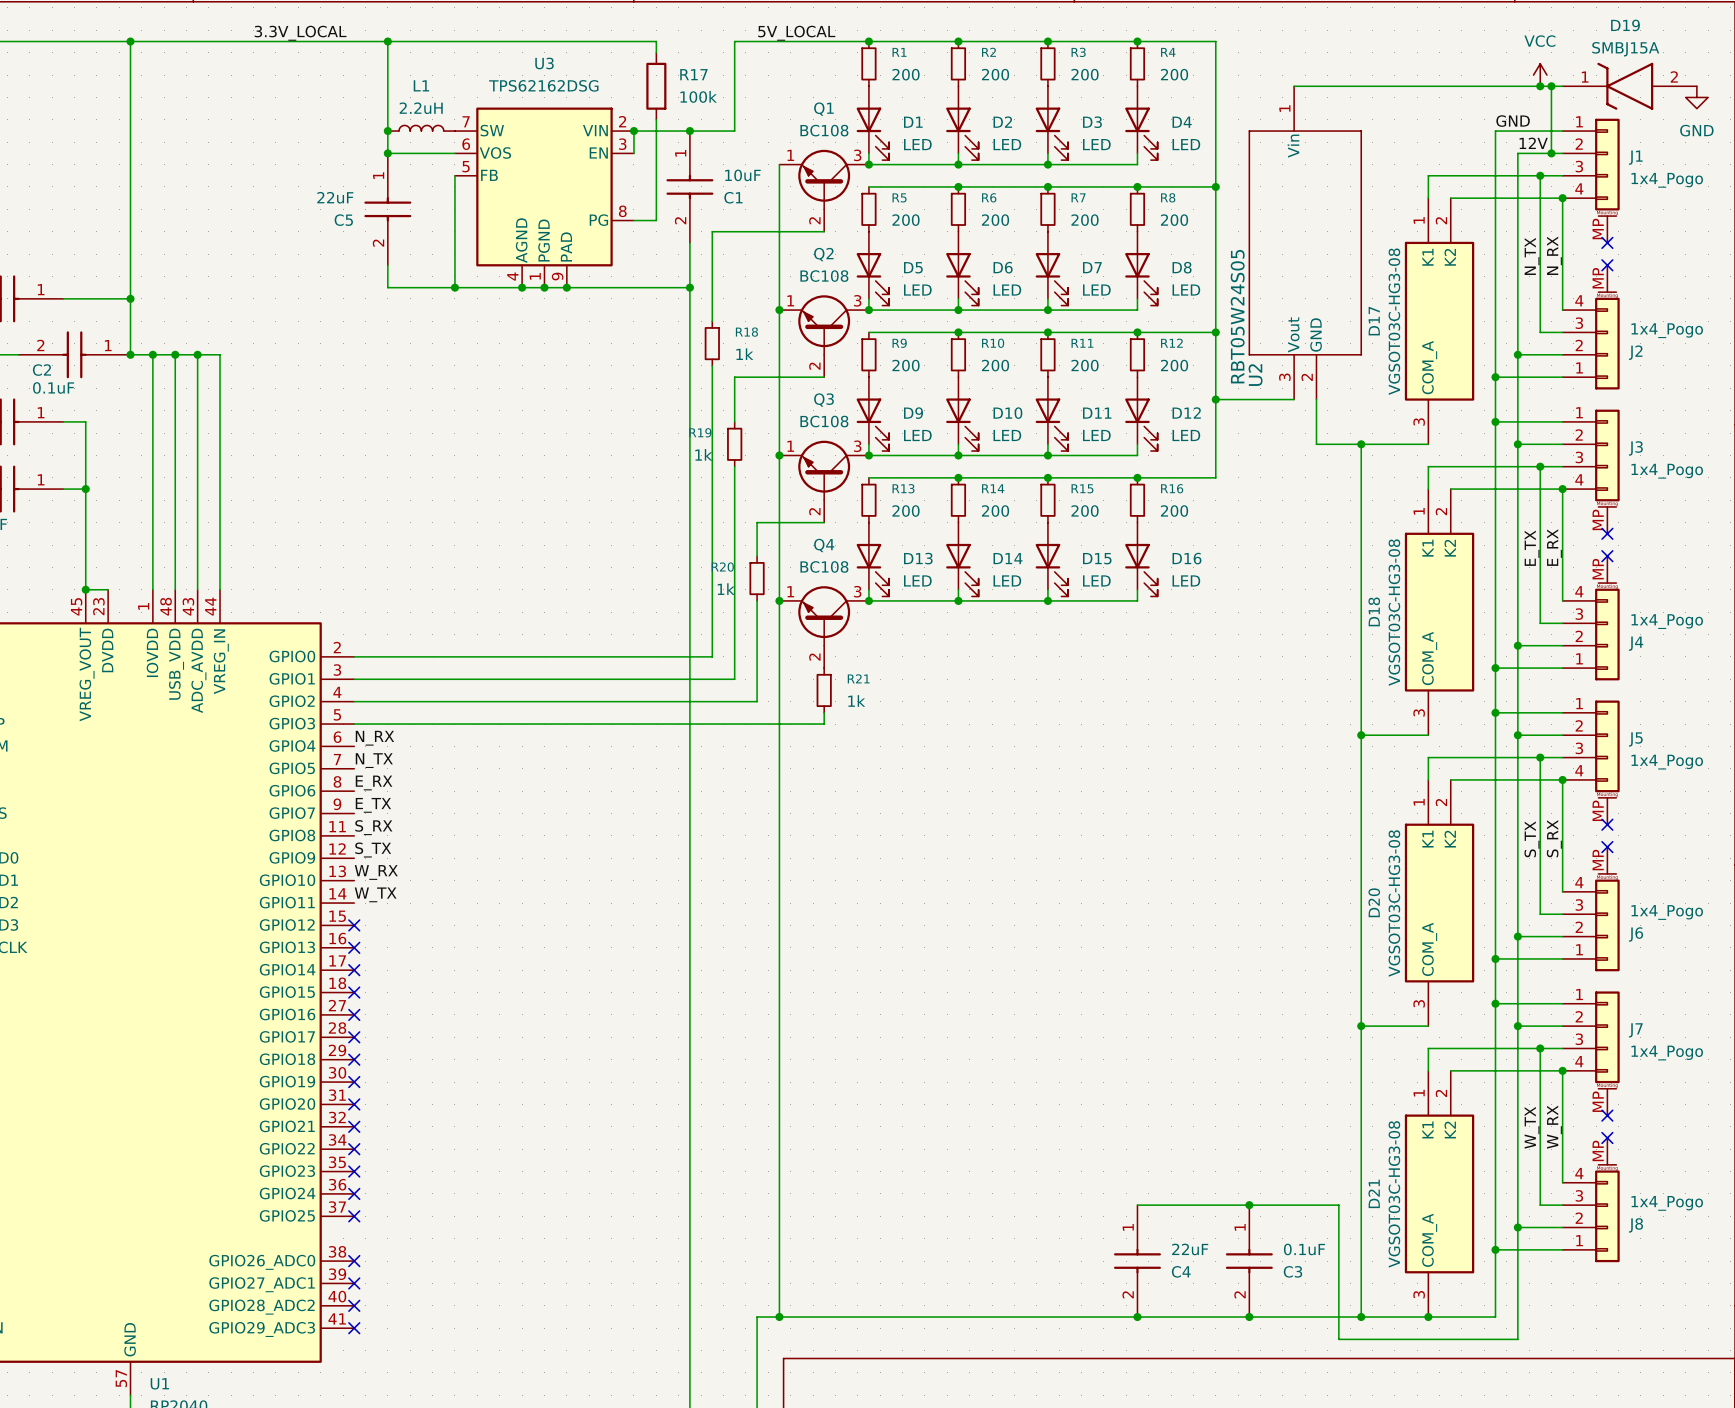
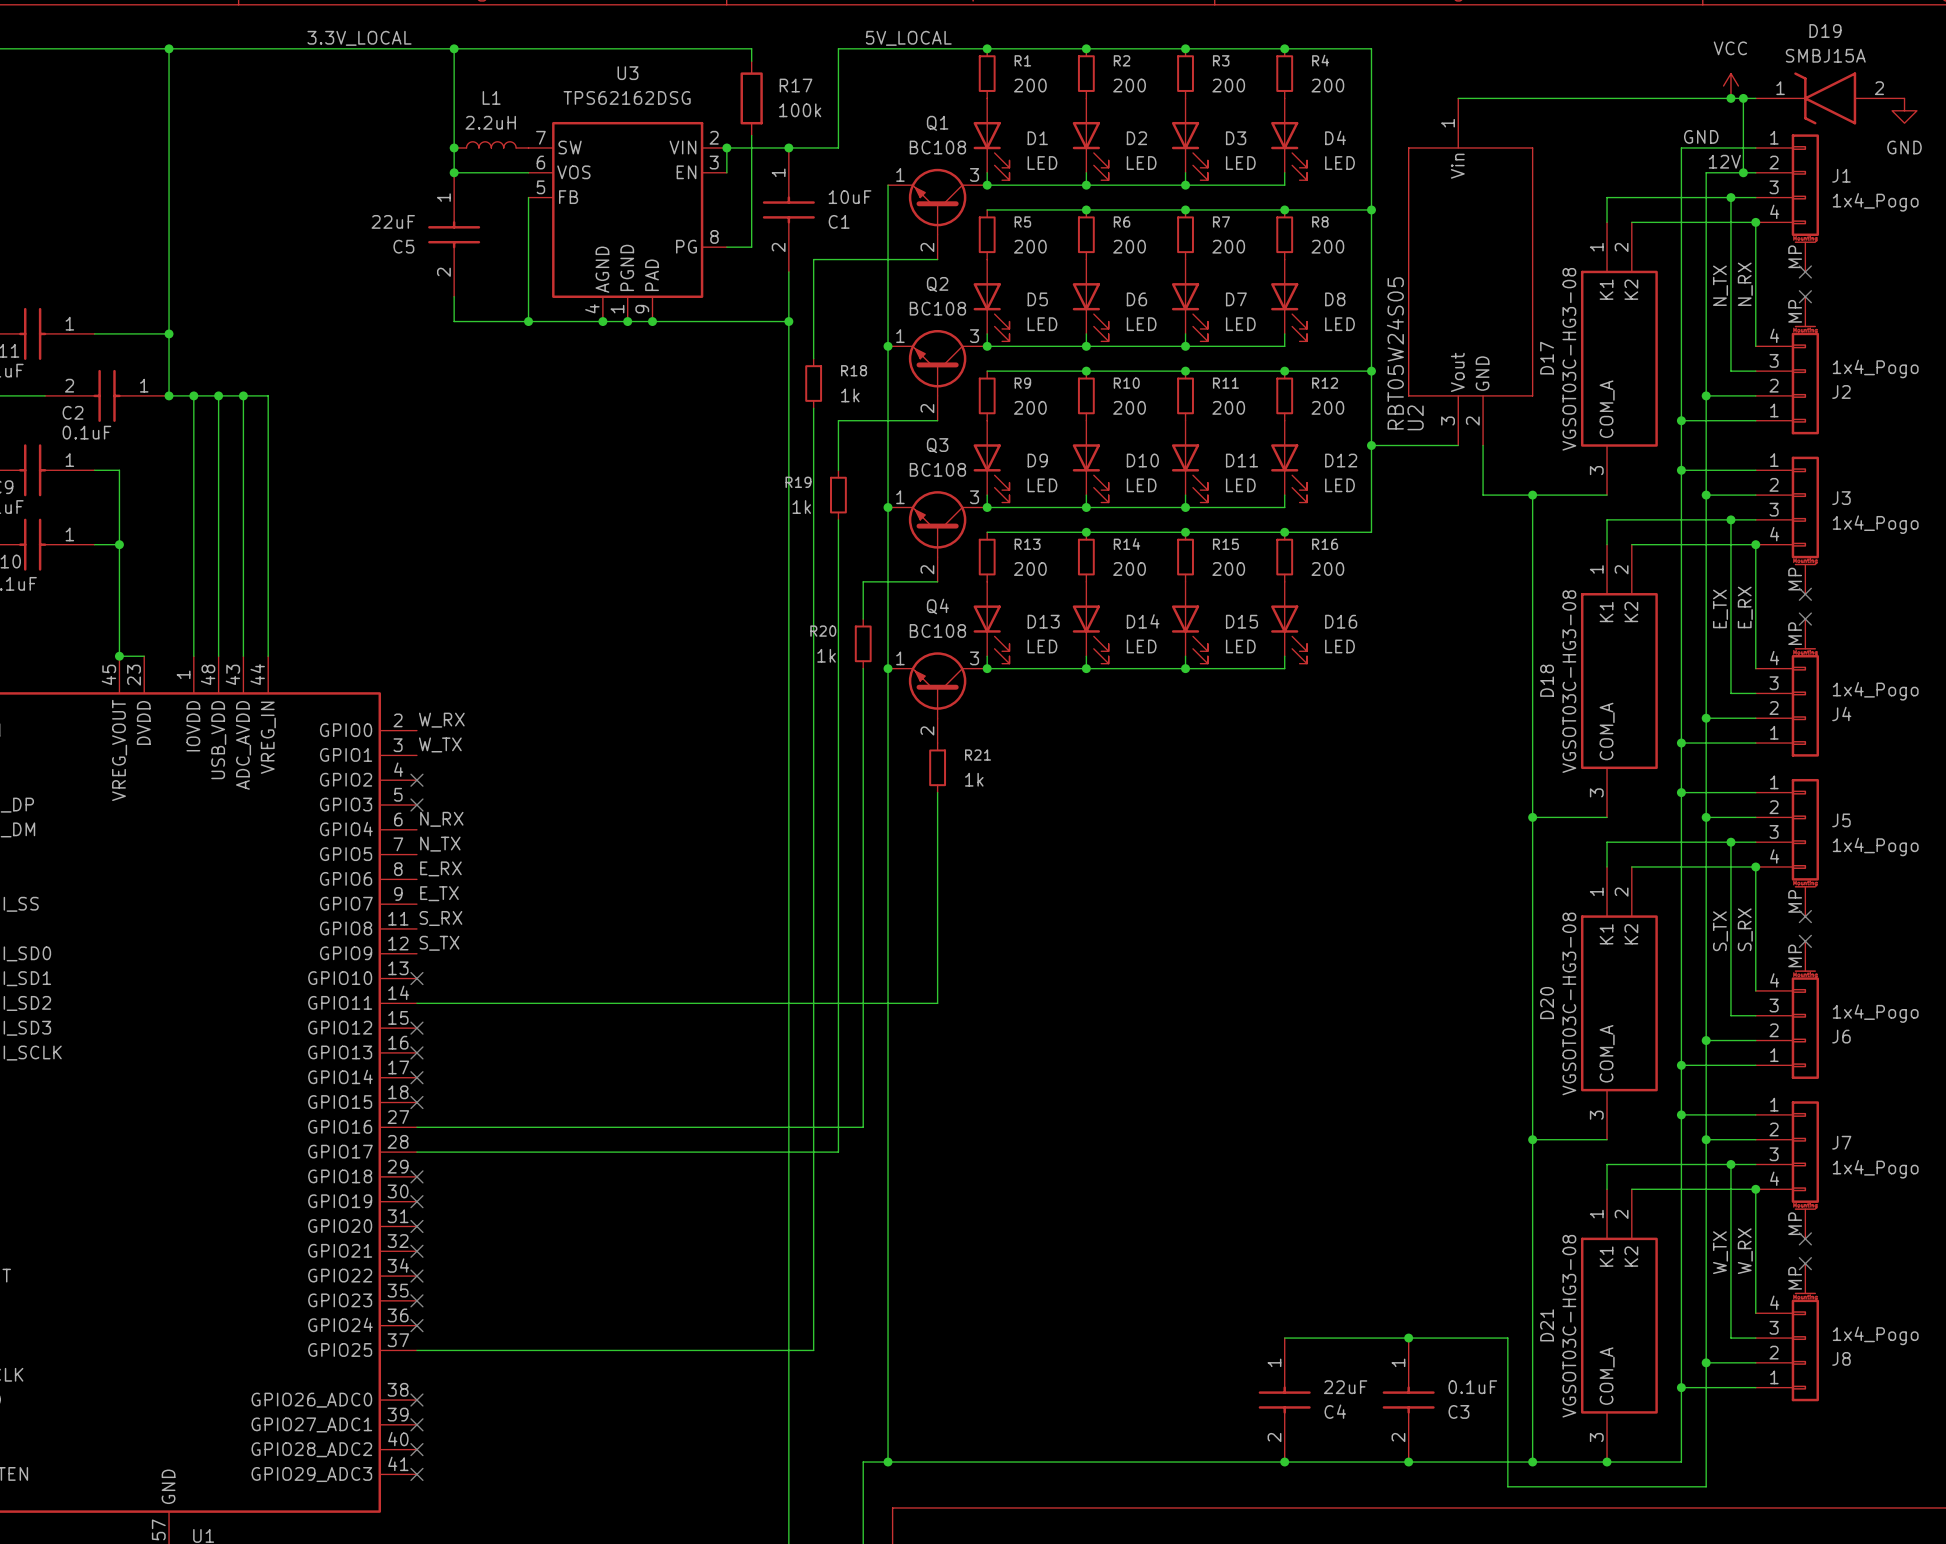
label: none -> W_RX (441, 720)
wire: (354, 656) (712, 656) -> (416, 1350) (813, 1350) (813, 730)
label: none -> W_TX (440, 744)
wire: (354, 679) (734, 679) -> (416, 1152) (838, 1152) (838, 755)
wire: (354, 701) (757, 701) -> (416, 1127) (863, 1127) (863, 780)
no-connect mark: none -> (416, 780)
wire: (354, 724) (824, 724) -> (416, 1003) (937, 1003) (937, 805)
no-connect mark: none -> (416, 805)
label: W_RX (376, 872) -> none
no-connect mark: none -> (416, 978)
label: W_TX (375, 894) -> none
no-connect mark: (354, 1014) -> none
no-connect mark: (354, 1037) -> none
no-connect mark: (354, 1216) -> none

